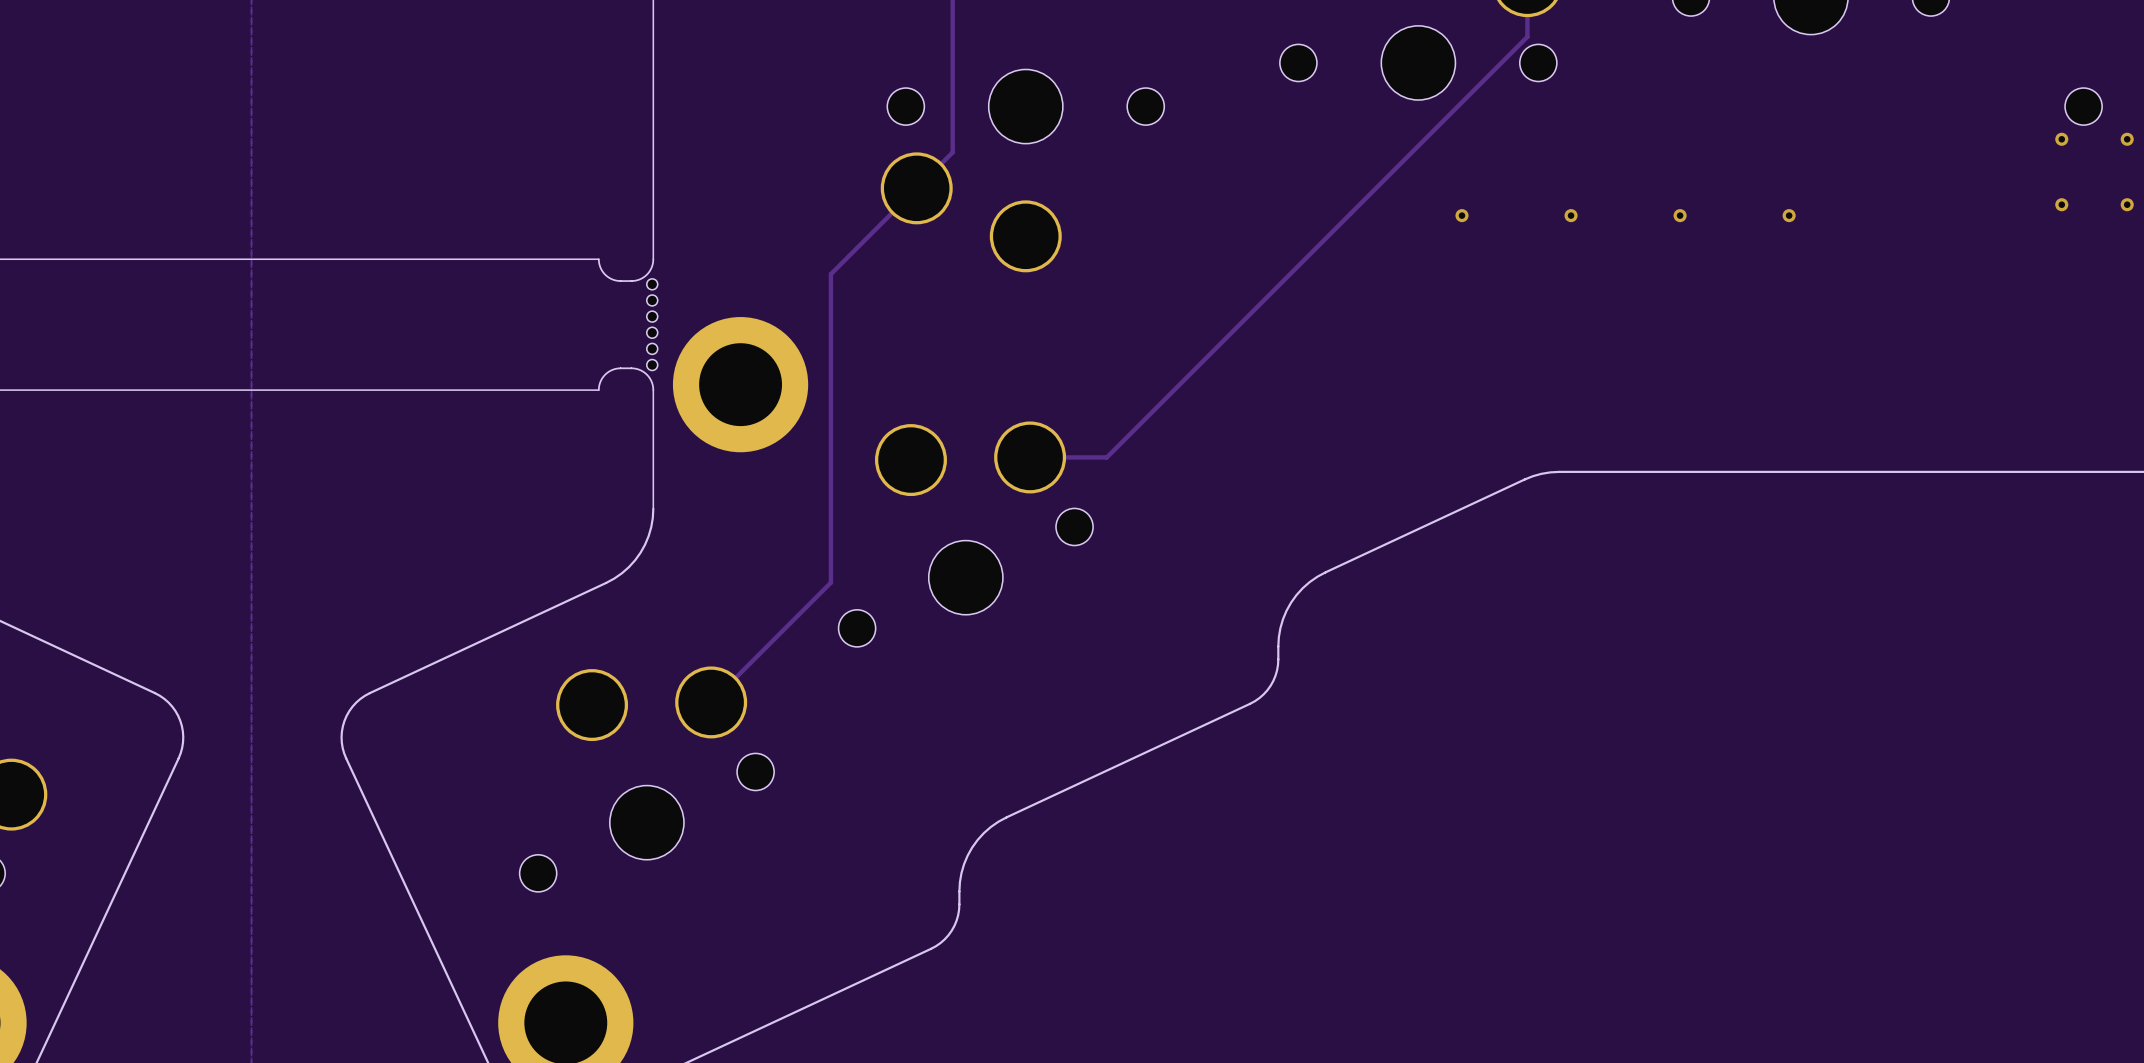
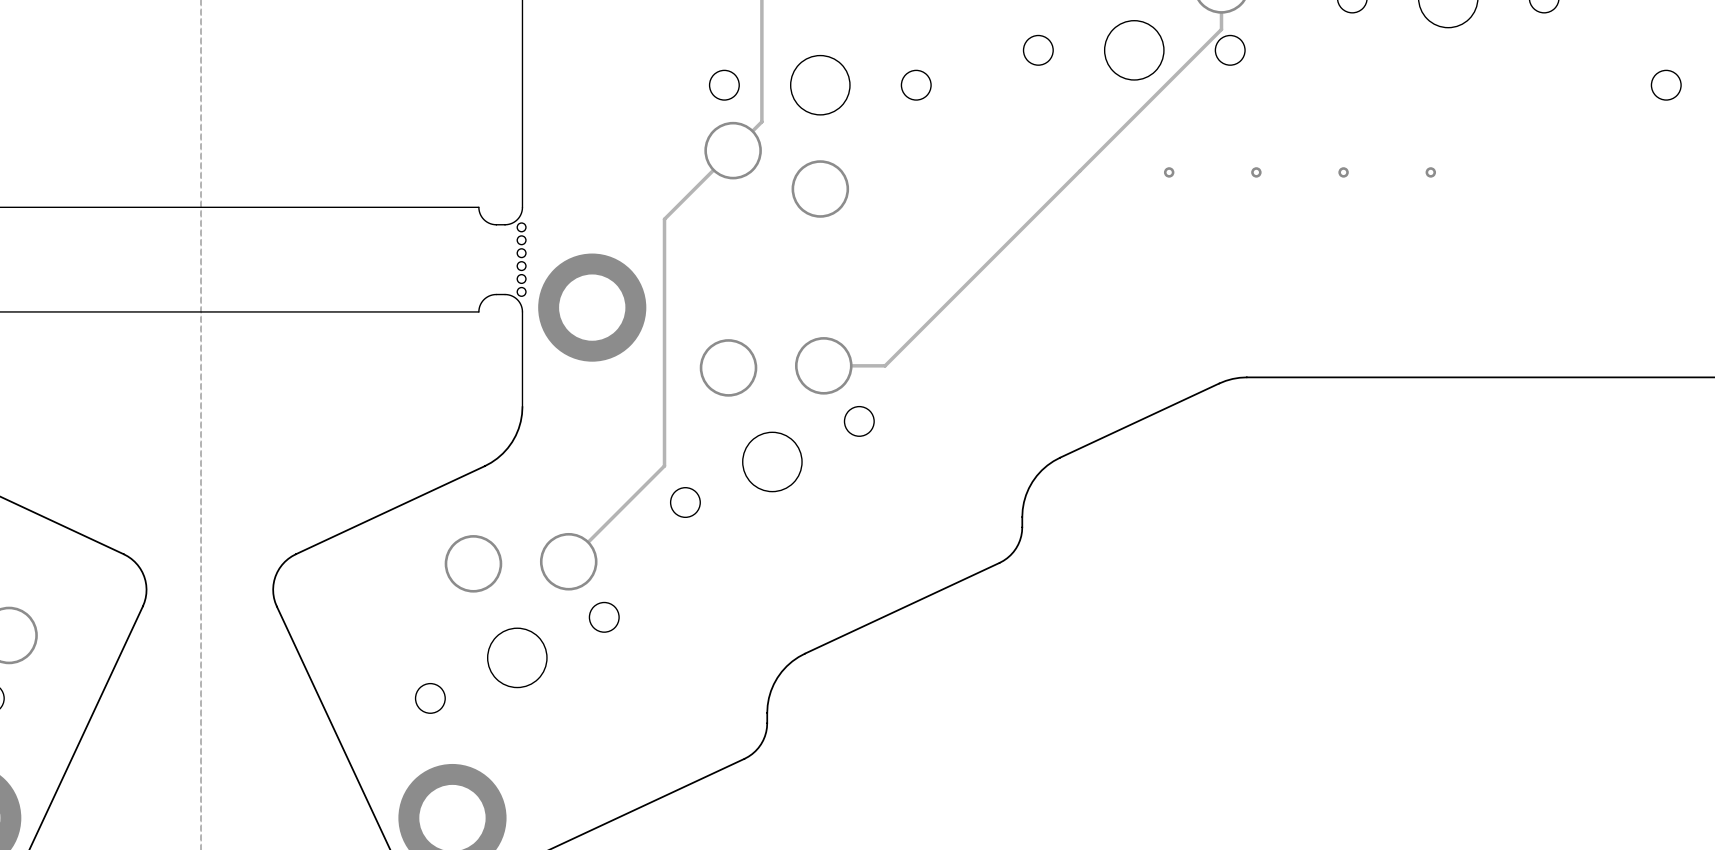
via: (2061, 139) -> none
via: (2127, 139) -> none
via: (2061, 204) -> none
via: (2127, 204) -> none

